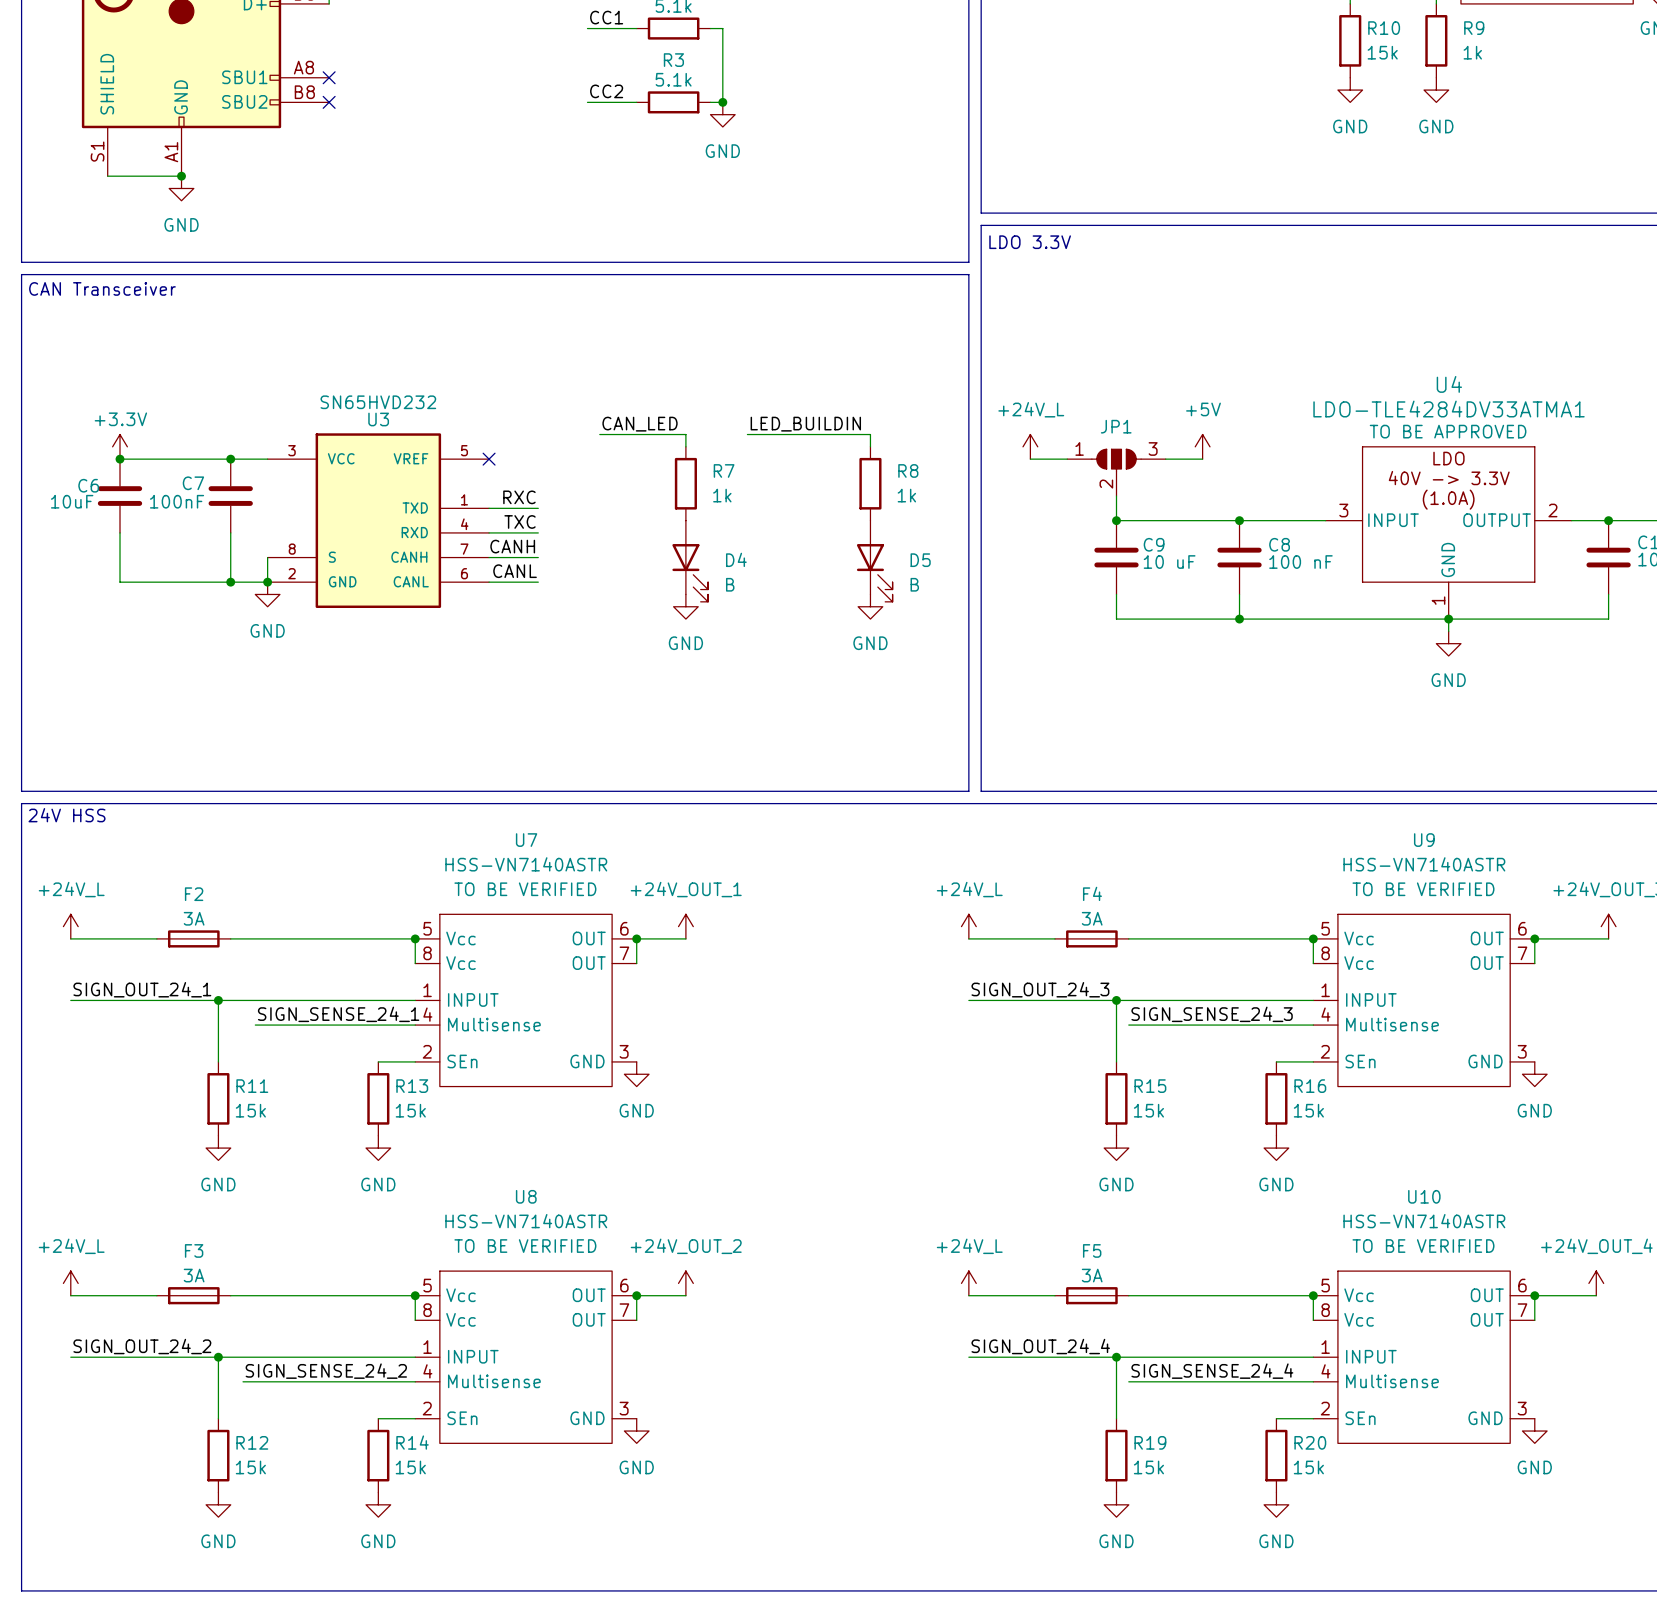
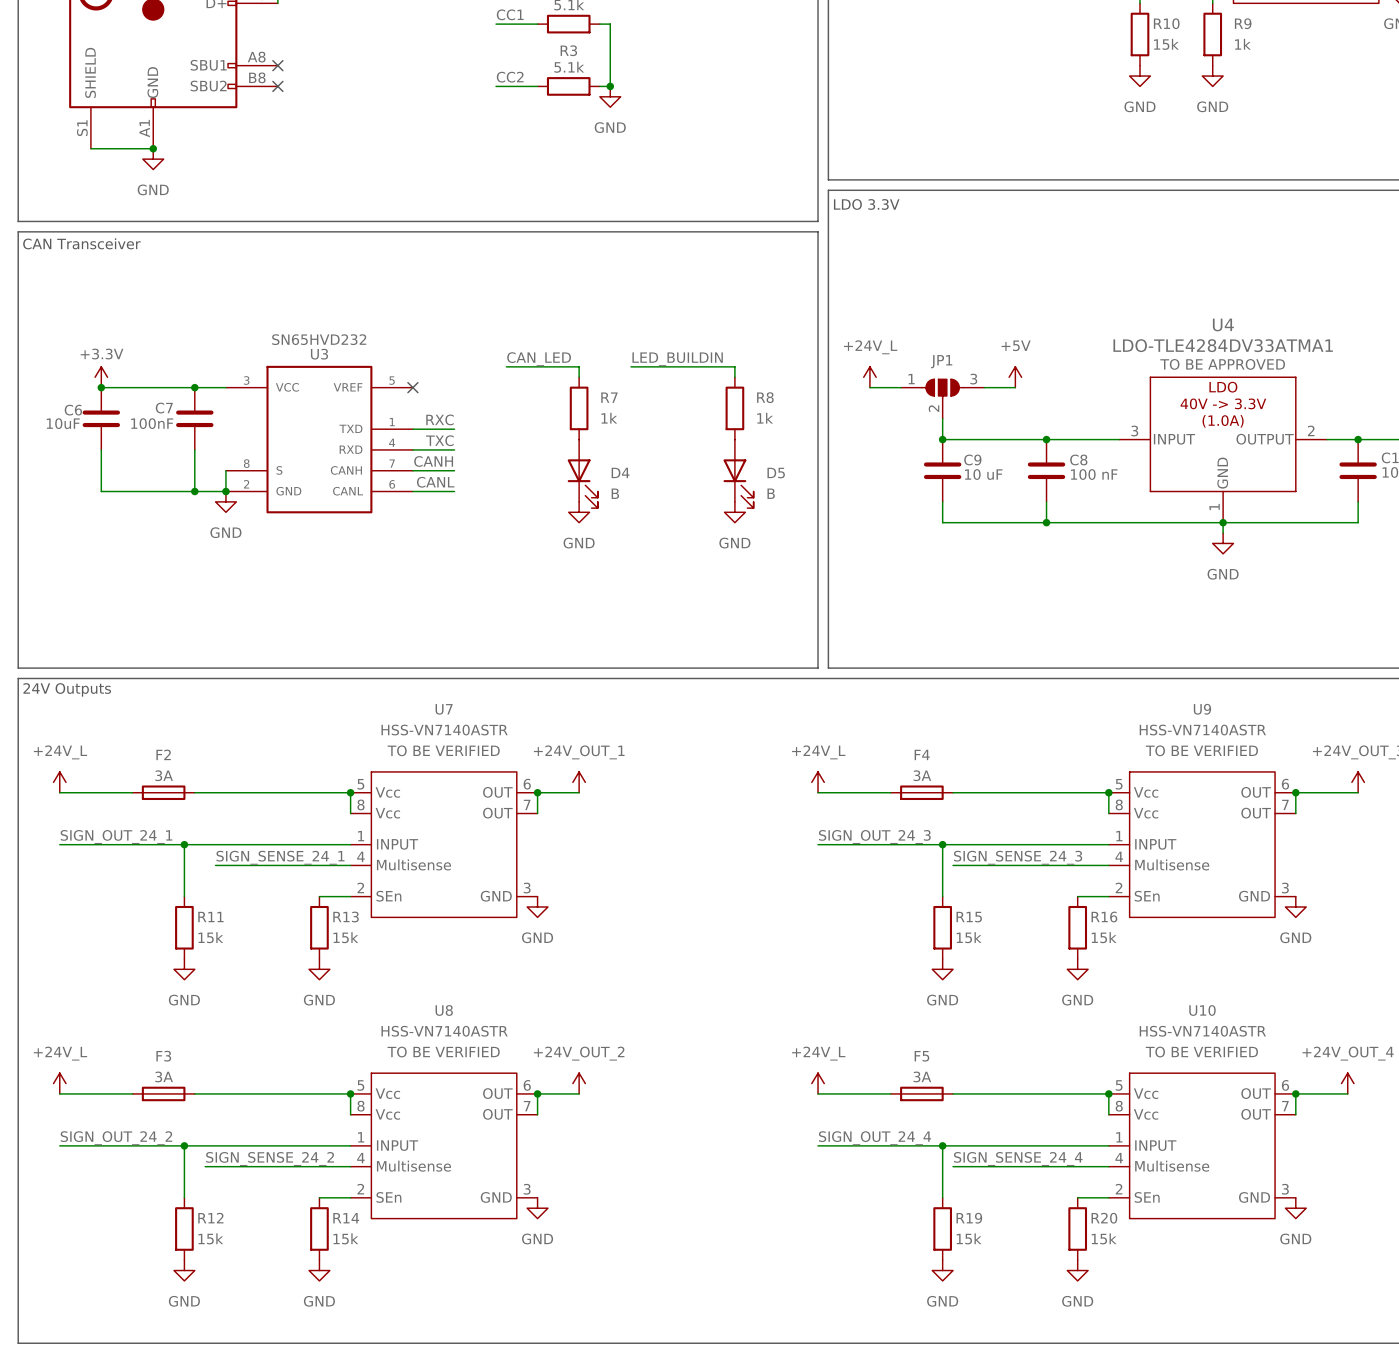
text: 24V HSS (67, 815) -> 24V Outputs (67, 689)

